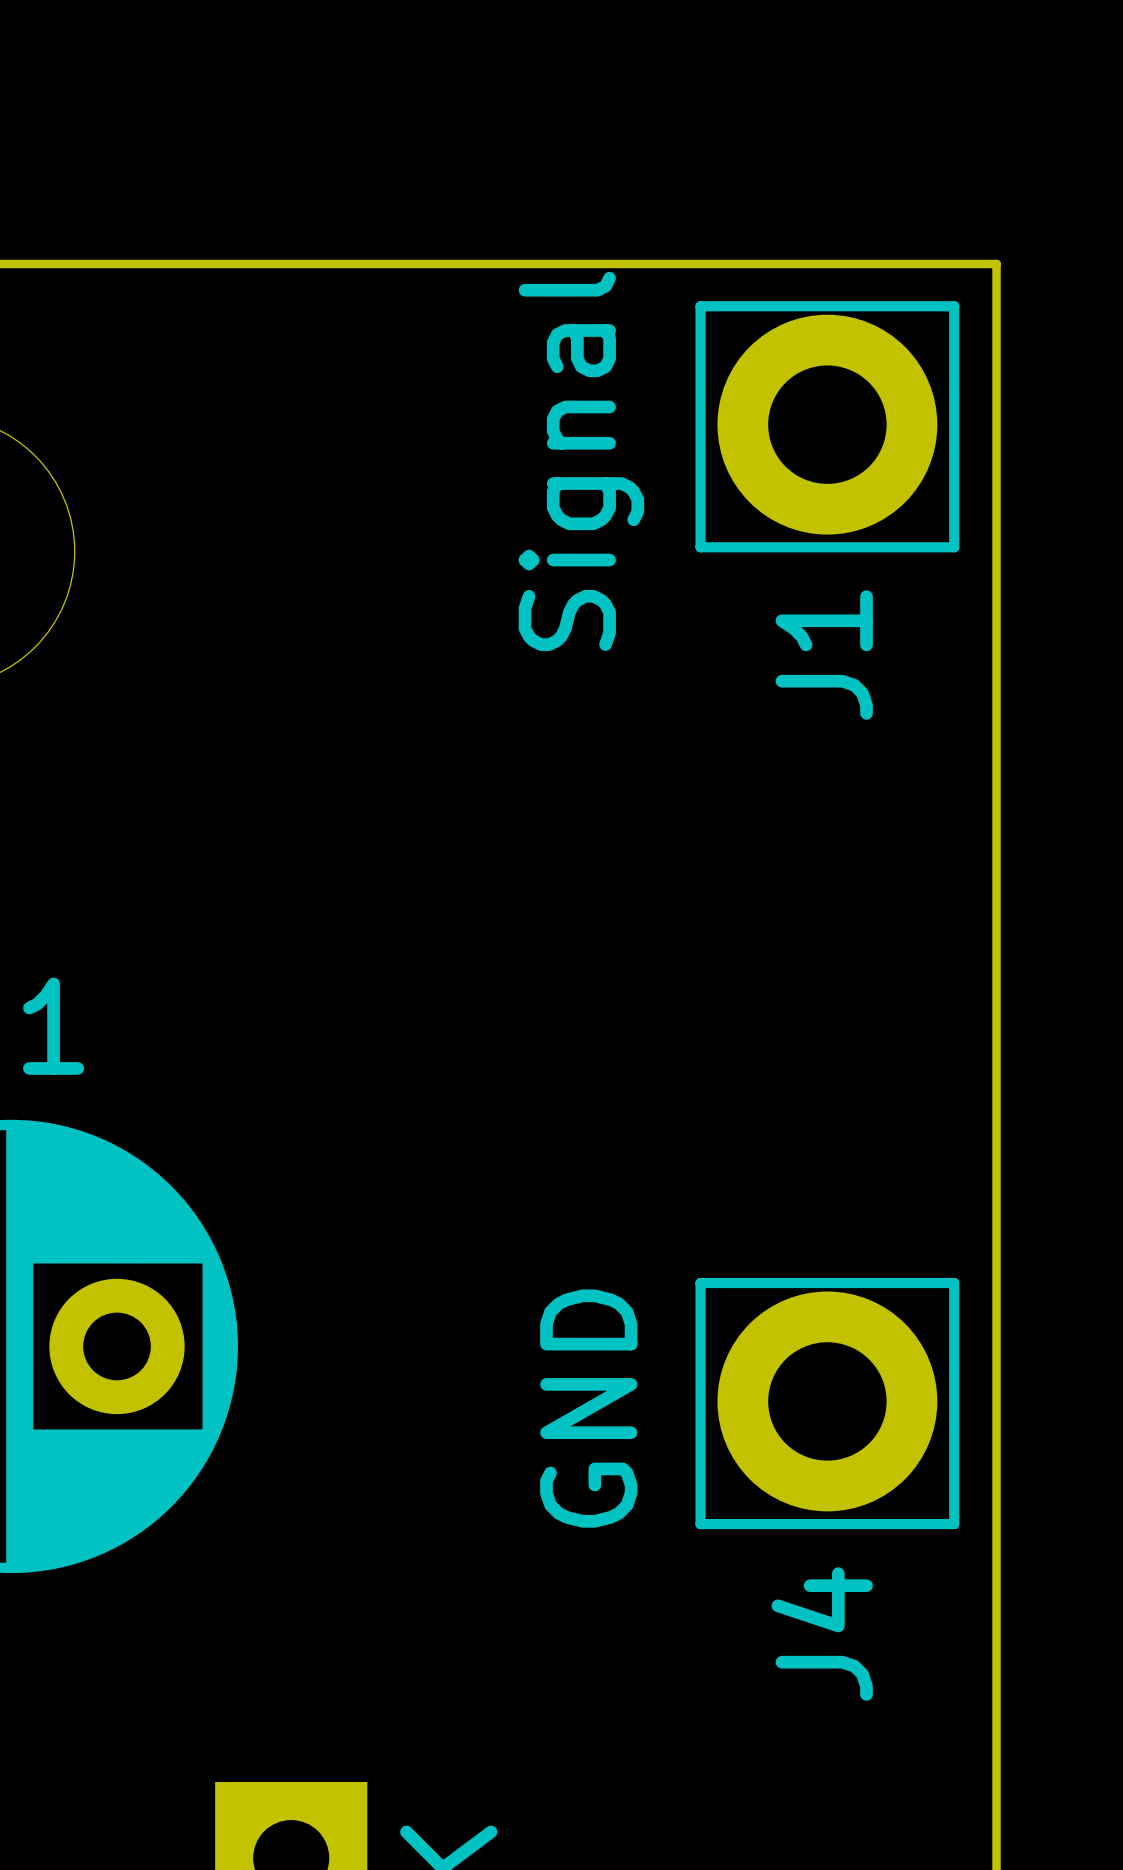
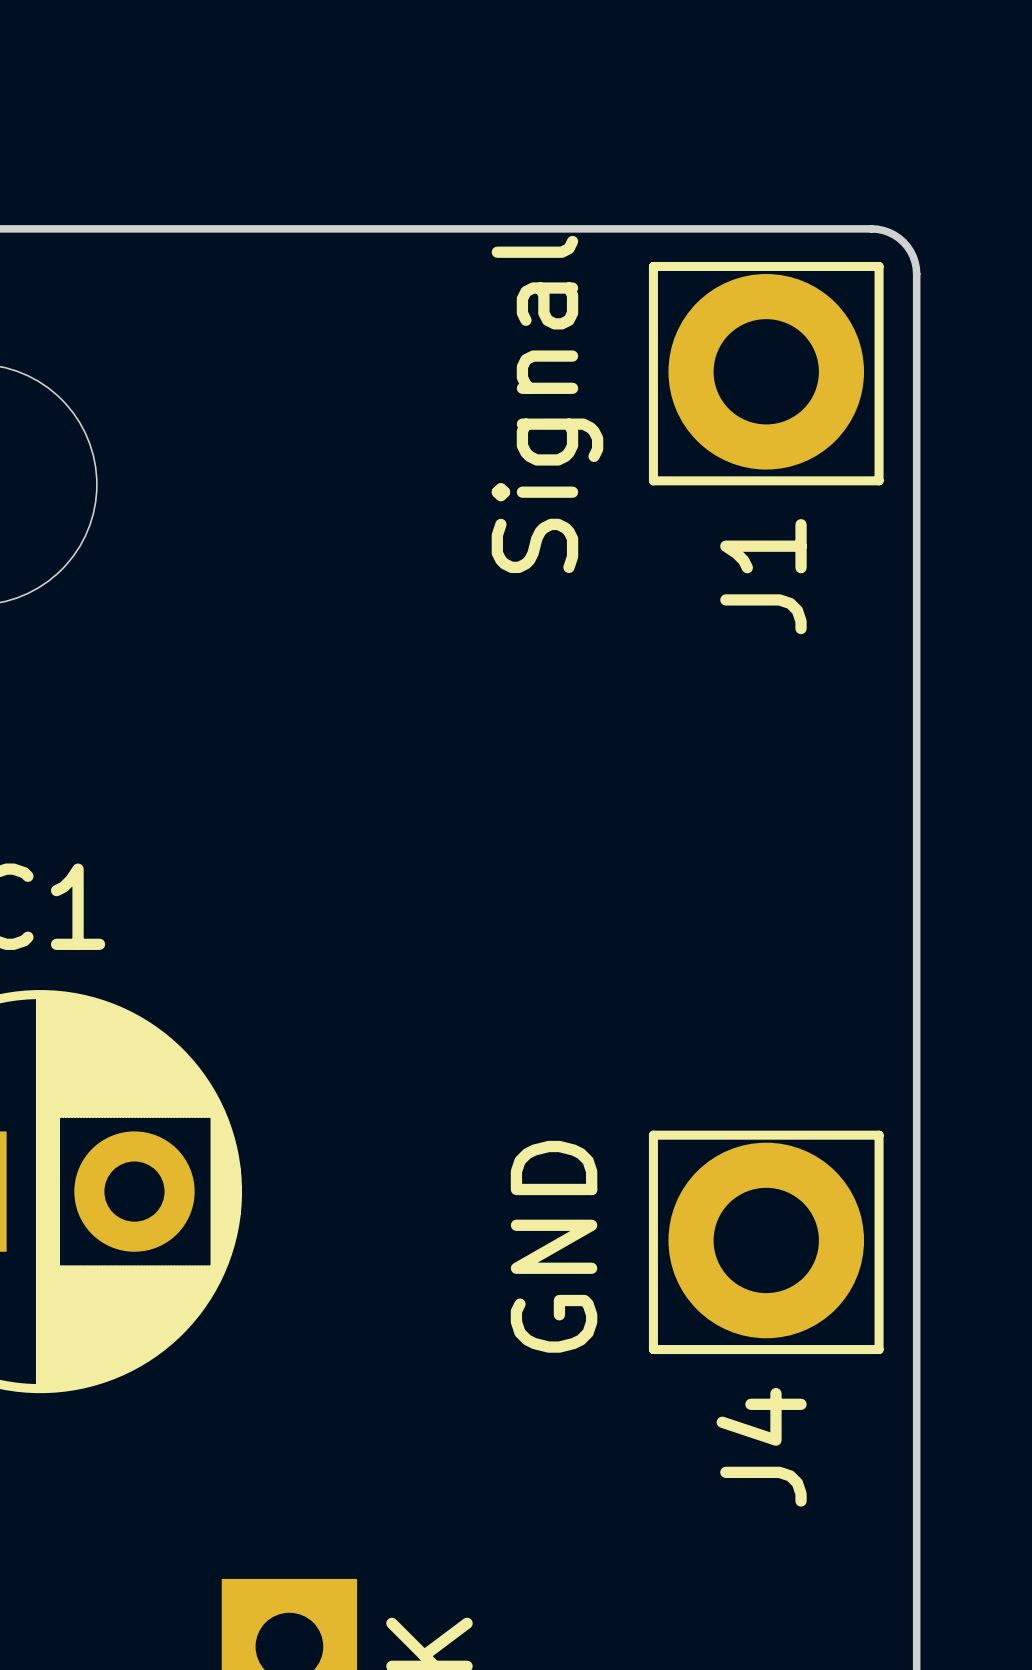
board edge: (945, 263) (996, 263) (996, 314) -> (871, 228) (888, 232) (903, 242) (913, 256) (916, 274)

